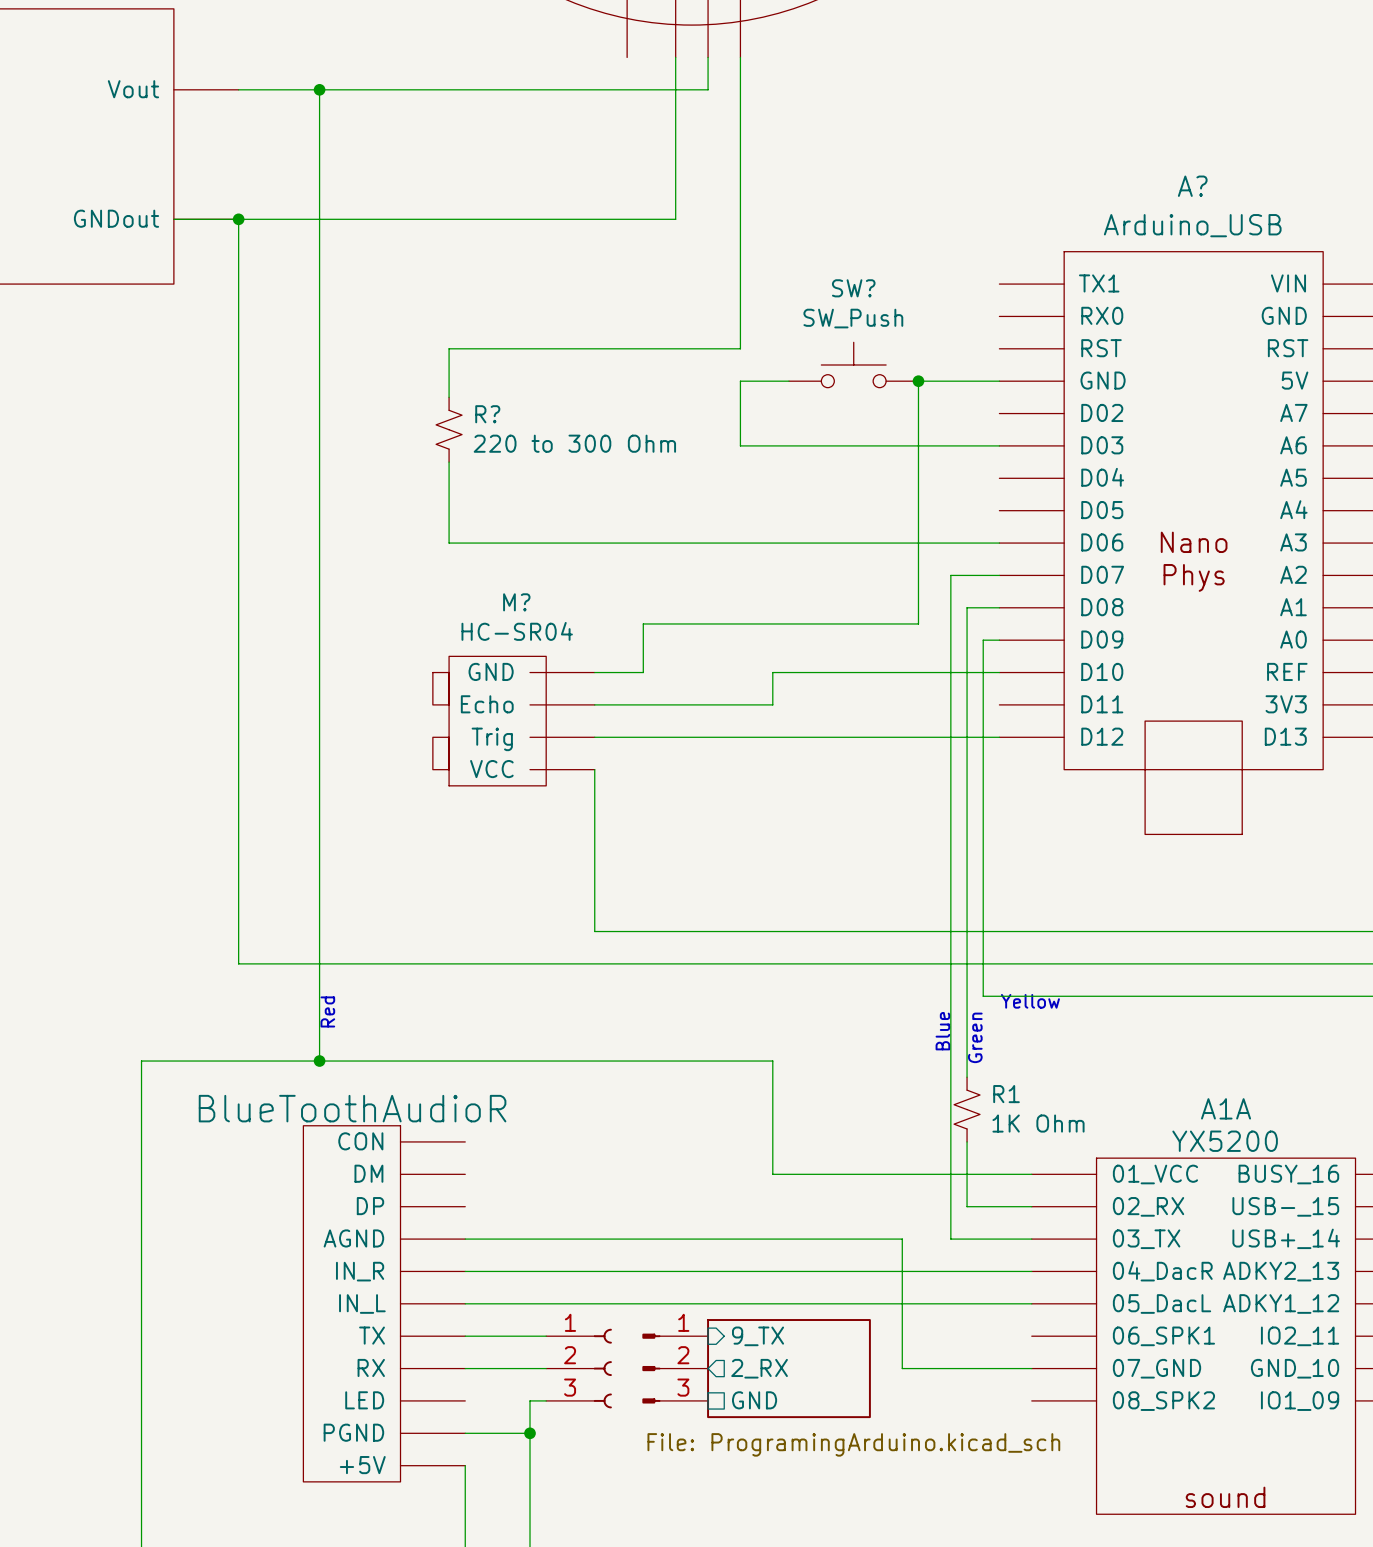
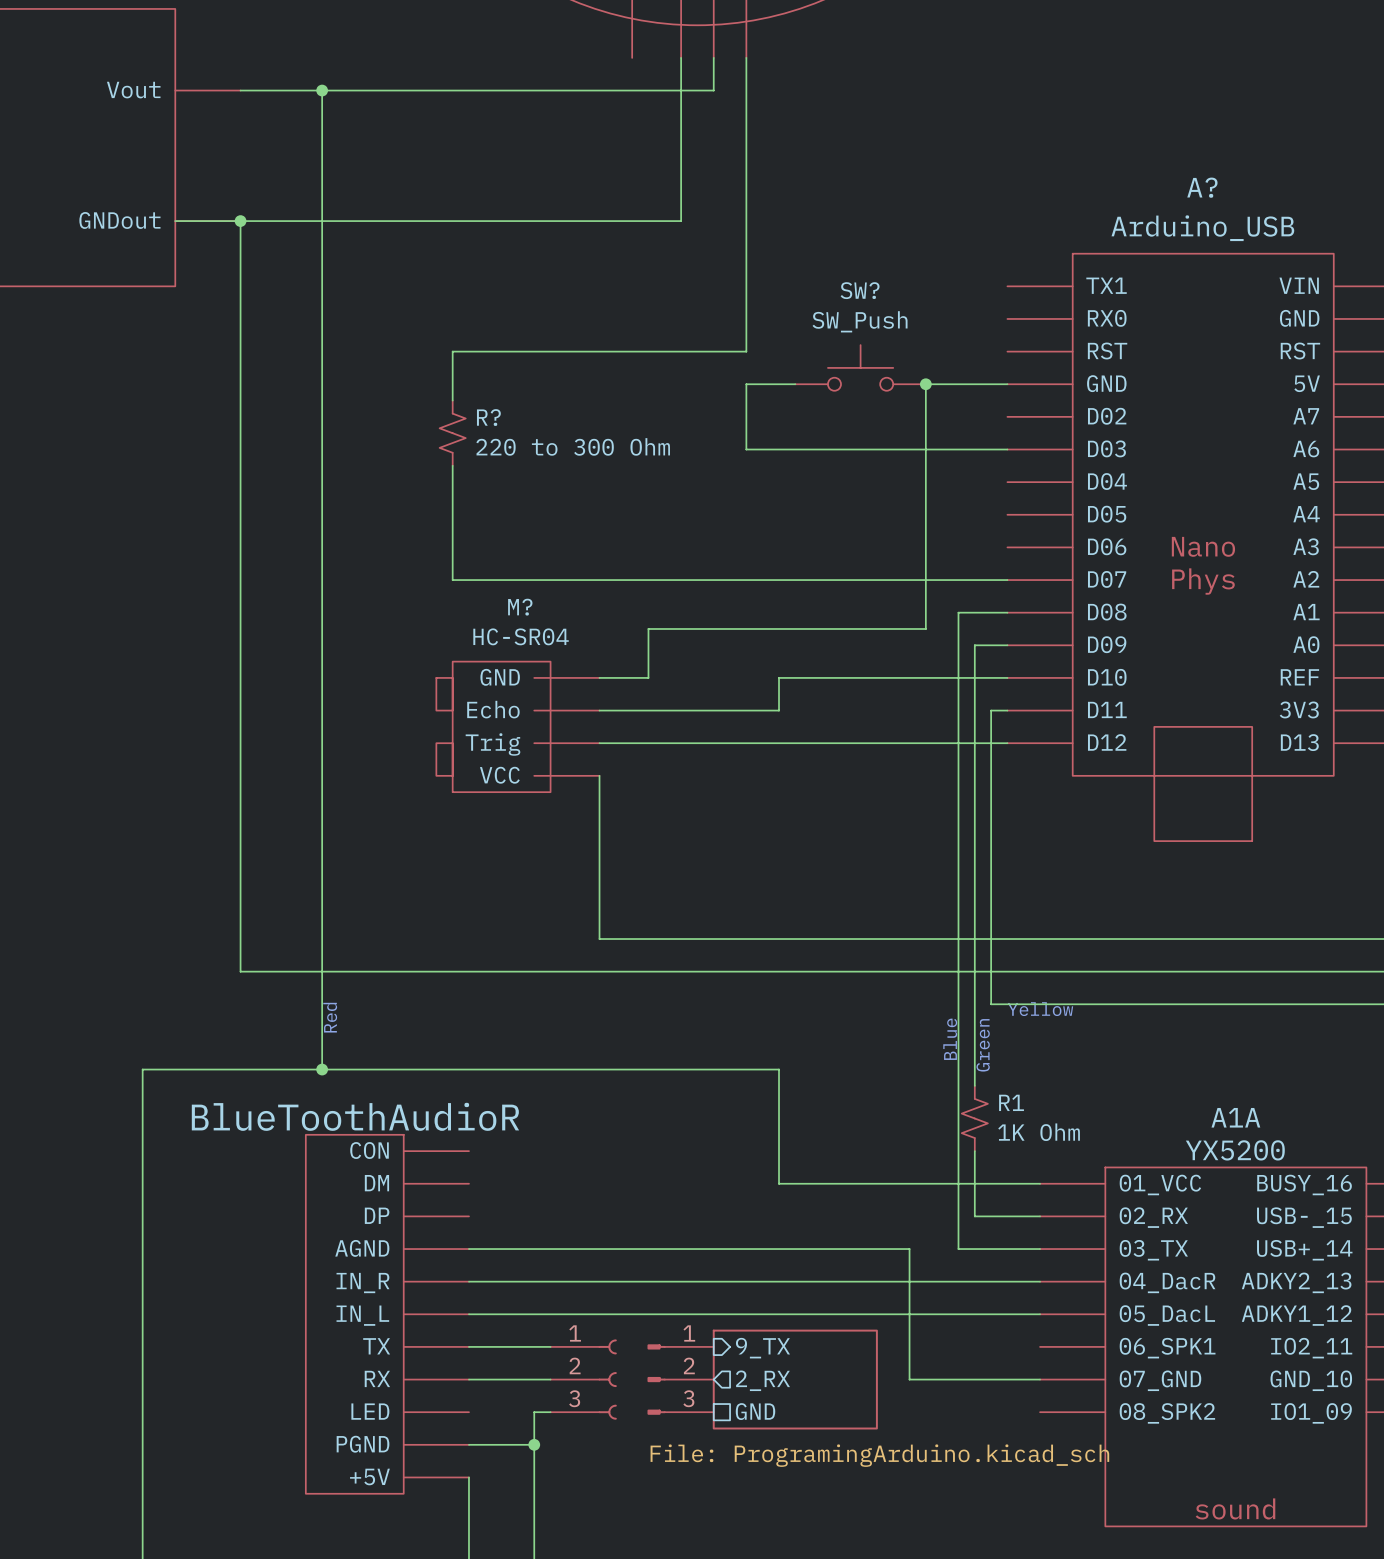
wire: (449, 543) (999, 543) -> (452, 547) (452, 580) (958, 580)
wire: (950, 575) (950, 607) -> (974, 612) (958, 612)
wire: (967, 607) (967, 640) -> (991, 645) (974, 645)
wire: (983, 640) (983, 704) -> (1007, 710) (991, 710)

